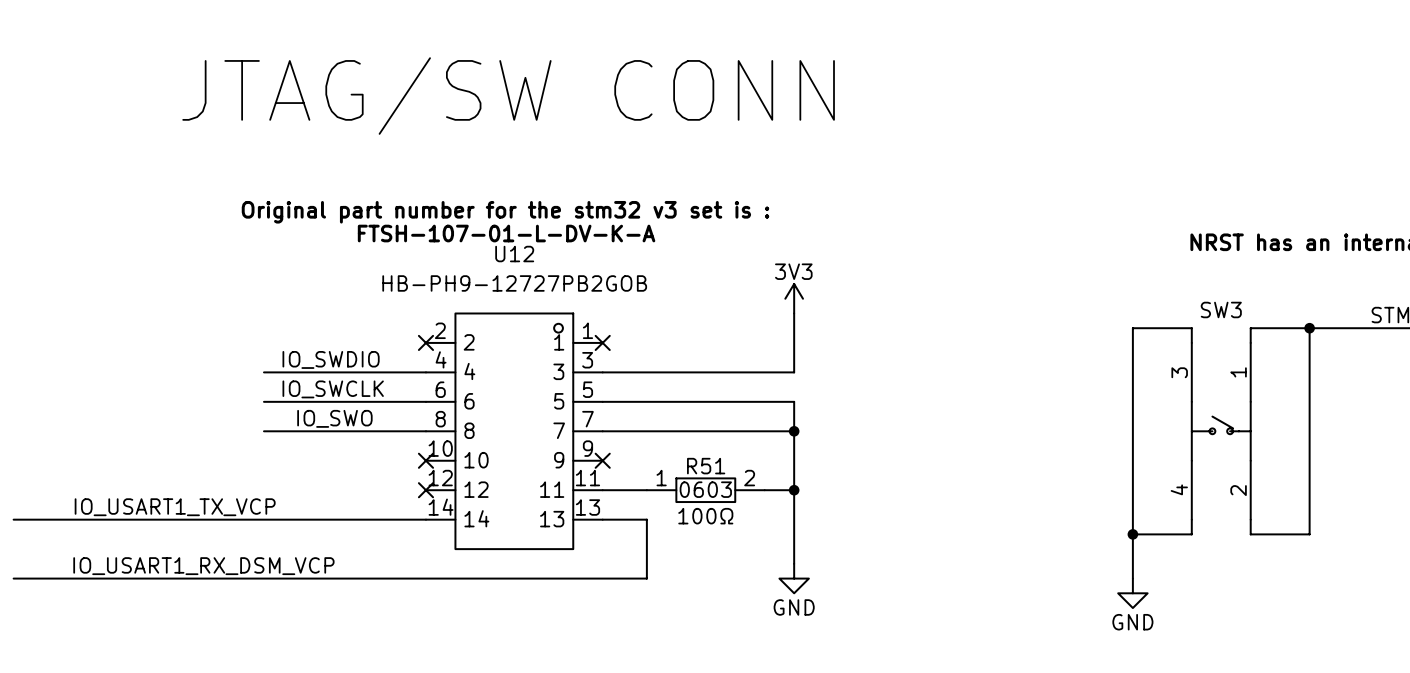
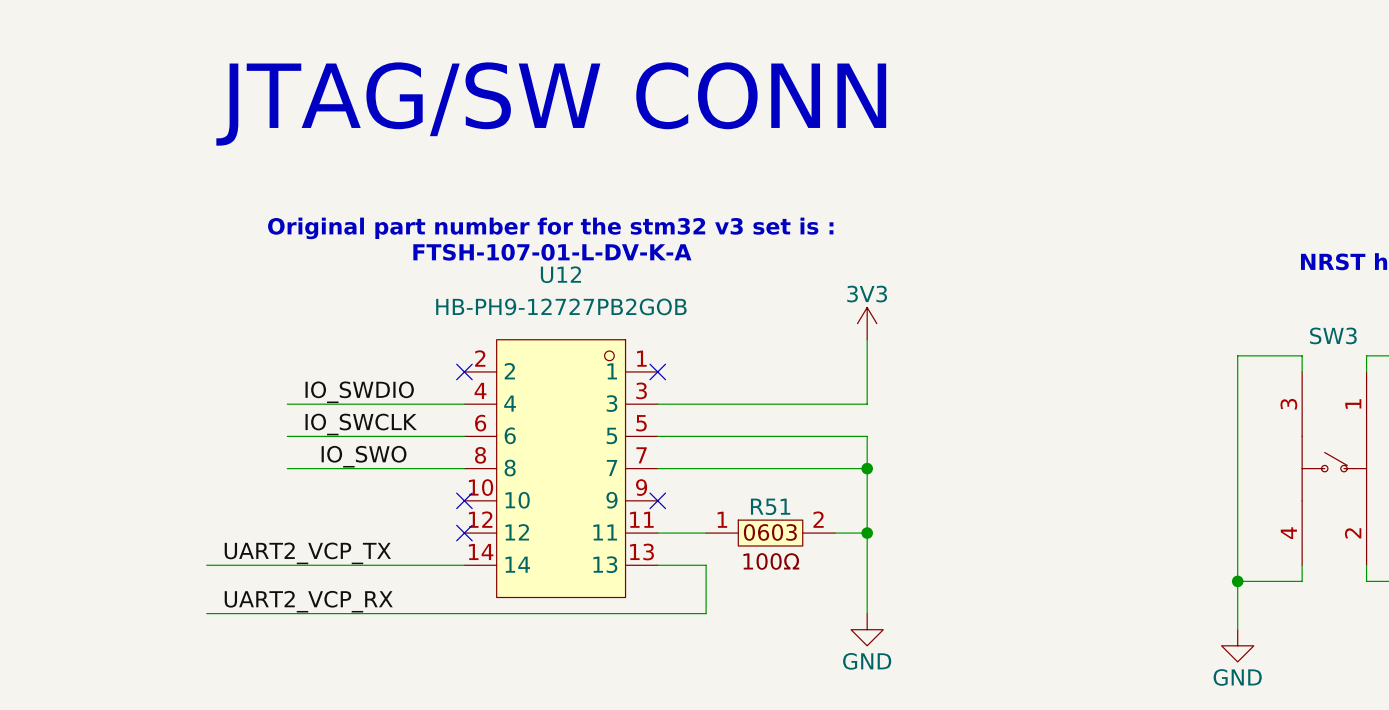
label: IO_USART1_TX_VCP (175, 507) -> none
label: none -> UART2_VCP_TX (307, 553)
wire: (13, 519) (190, 519) -> none
label: none -> UART2_VCP_RX (308, 601)
wire: (646, 563) (646, 578) (13, 578) -> (706, 613) (206, 613)
label: IO_USART1_RX_DSM_VCP (203, 566) -> none

